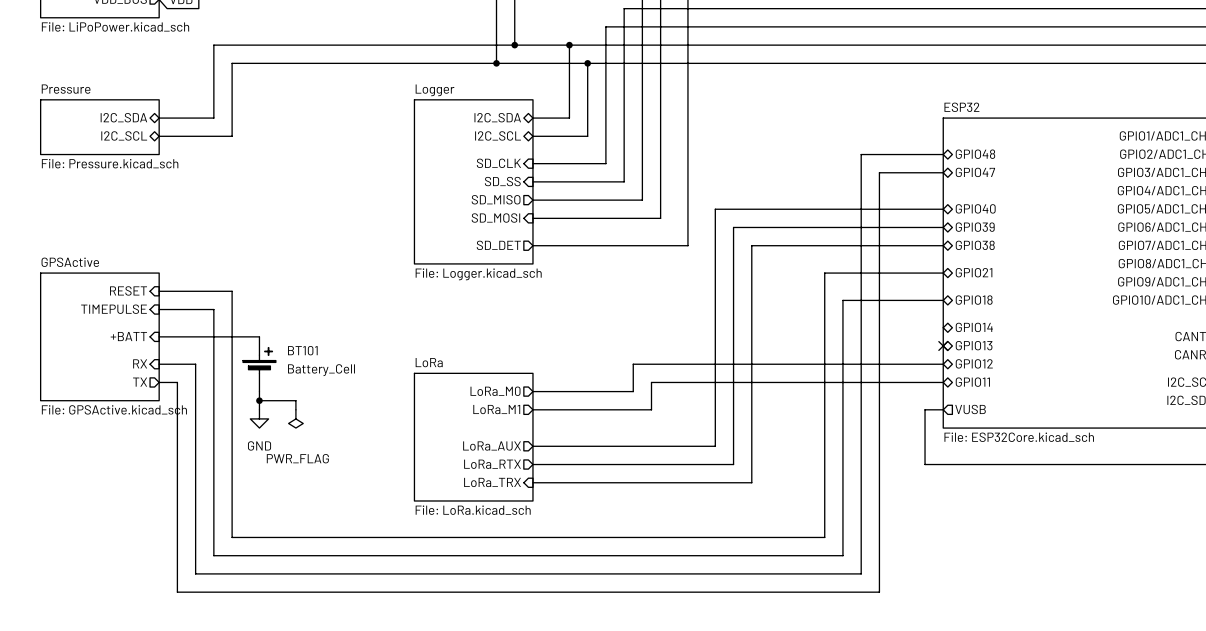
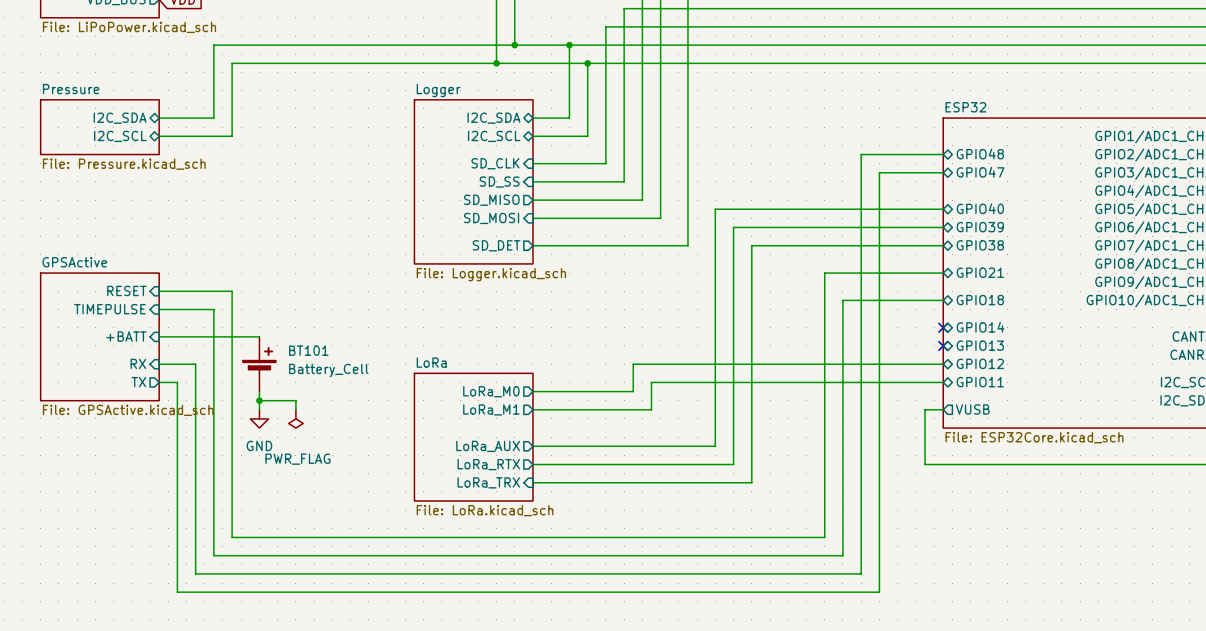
no-connect mark: none -> (943, 327)

